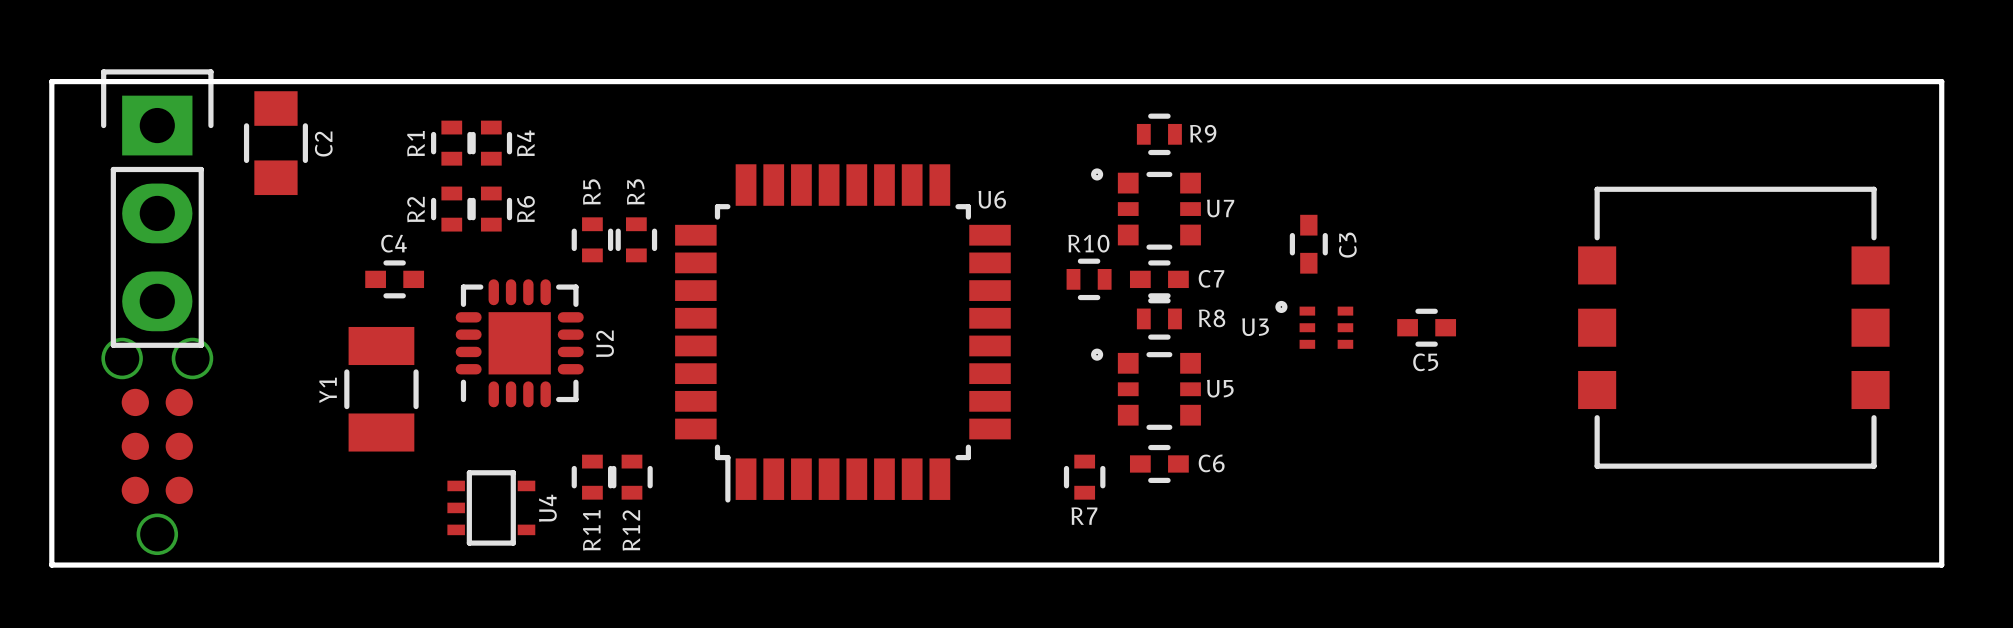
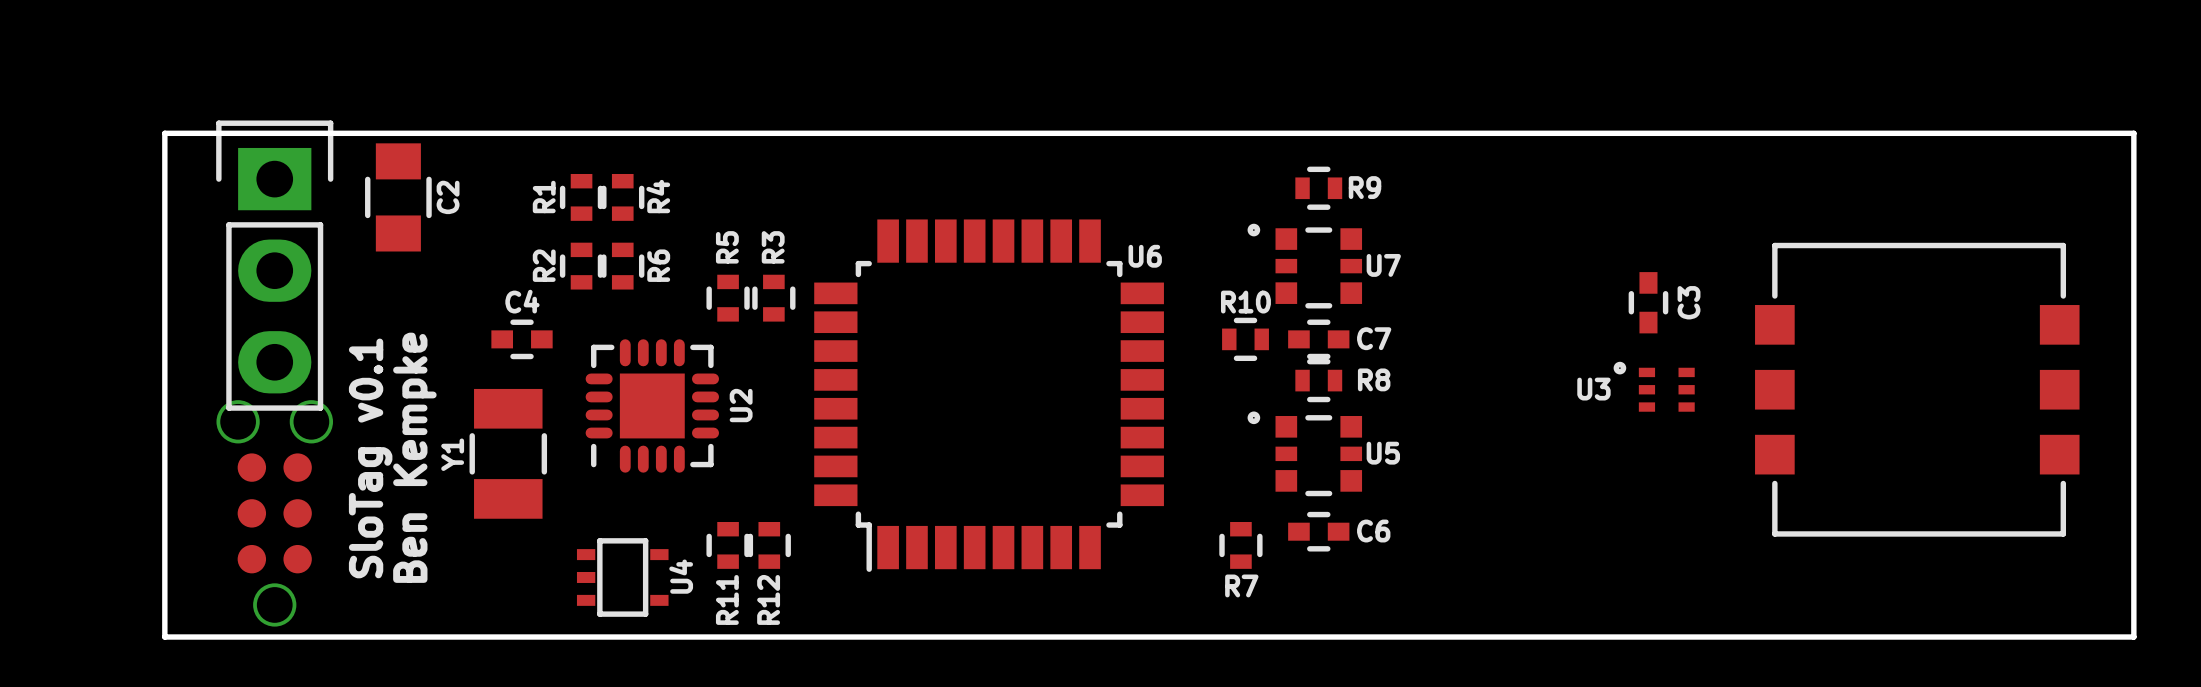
C3 position: (1308, 244) -> (1648, 302)
U3 position: (1314, 324) -> (1654, 386)
C5: (1426, 327) -> none
text: none -> Ben Kempke (414, 457)
text: none -> SloTag v0.1 (370, 458)

